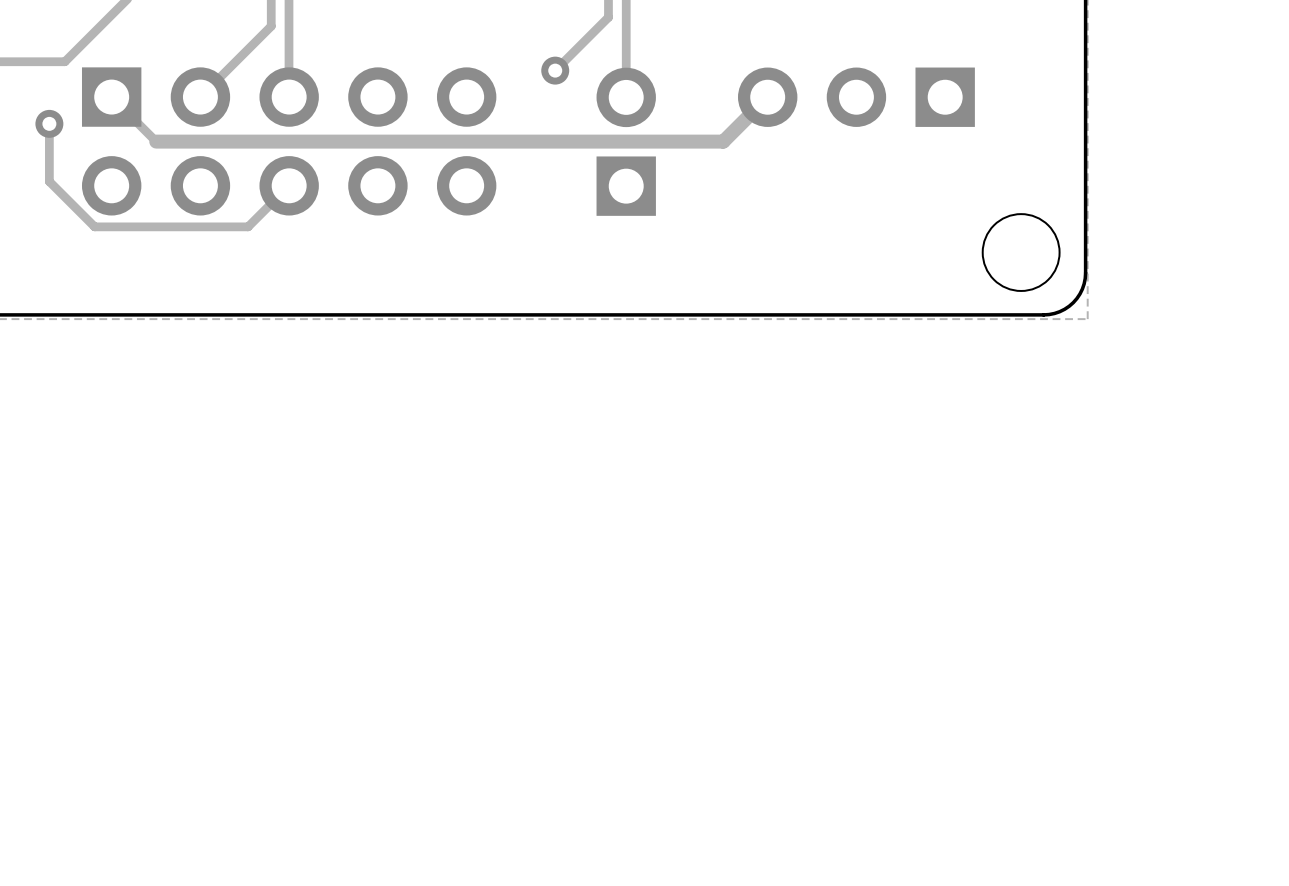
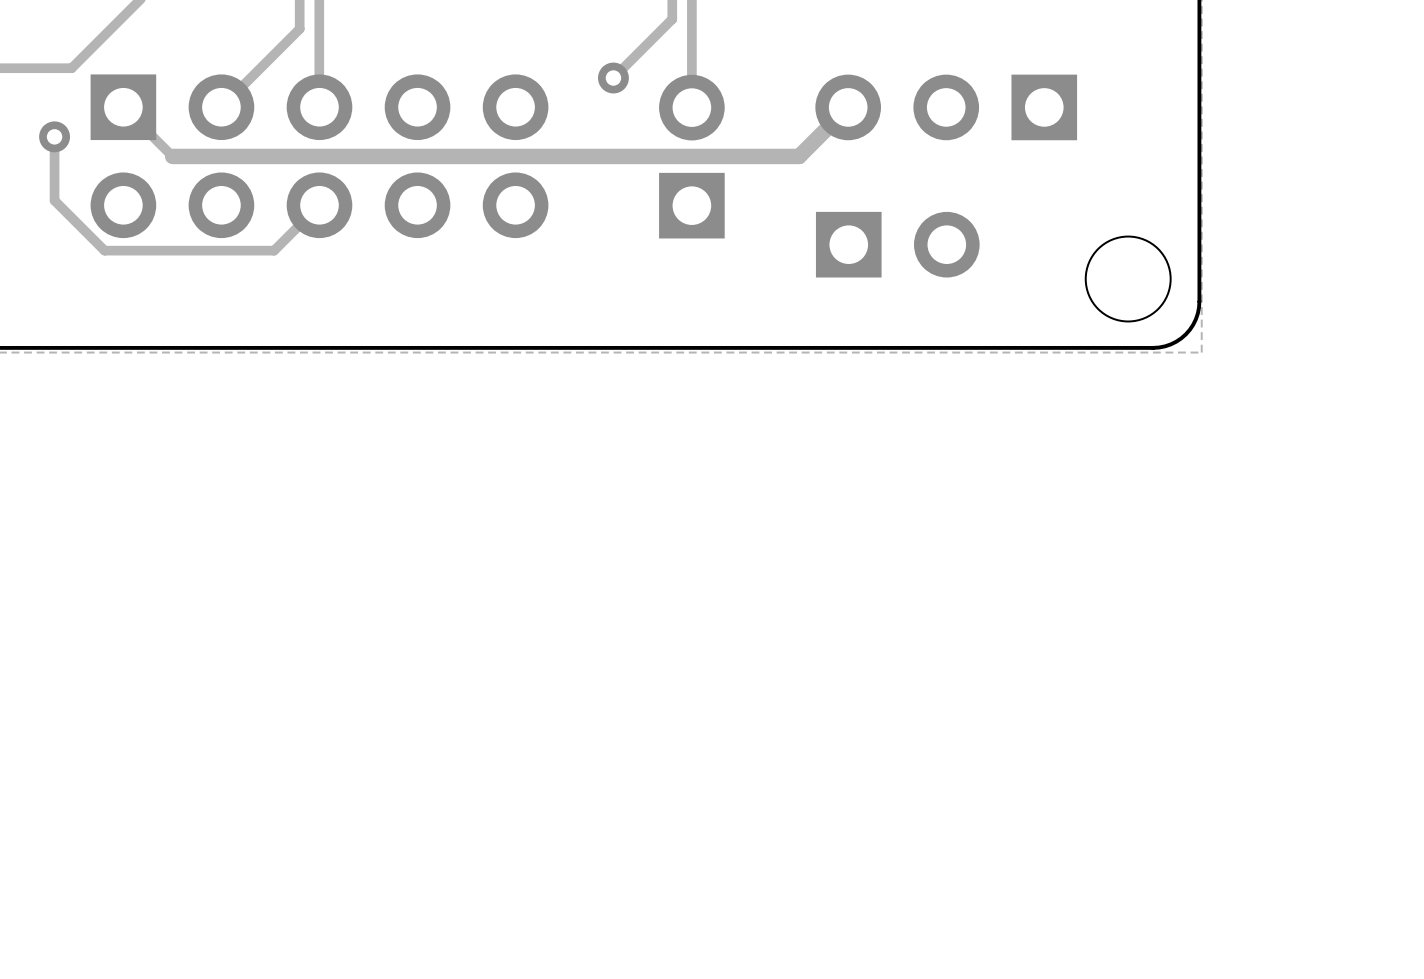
part: none -> (897, 244)

